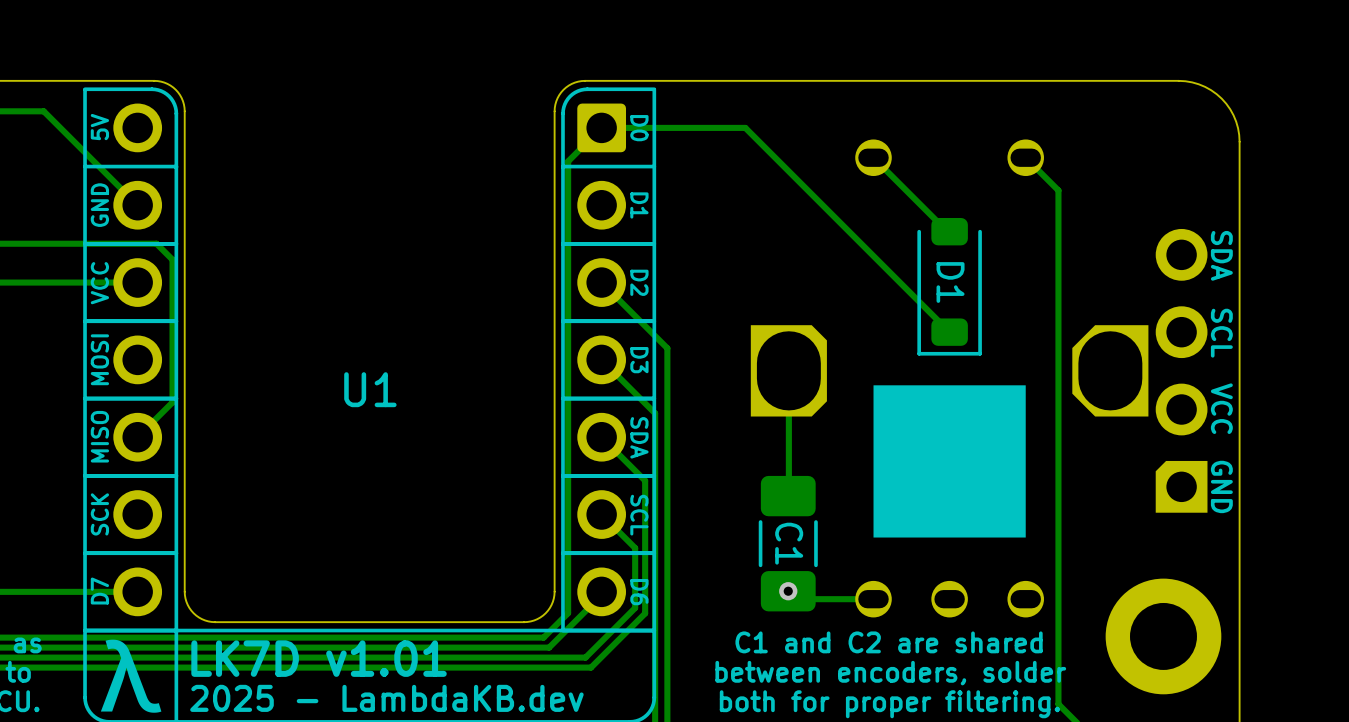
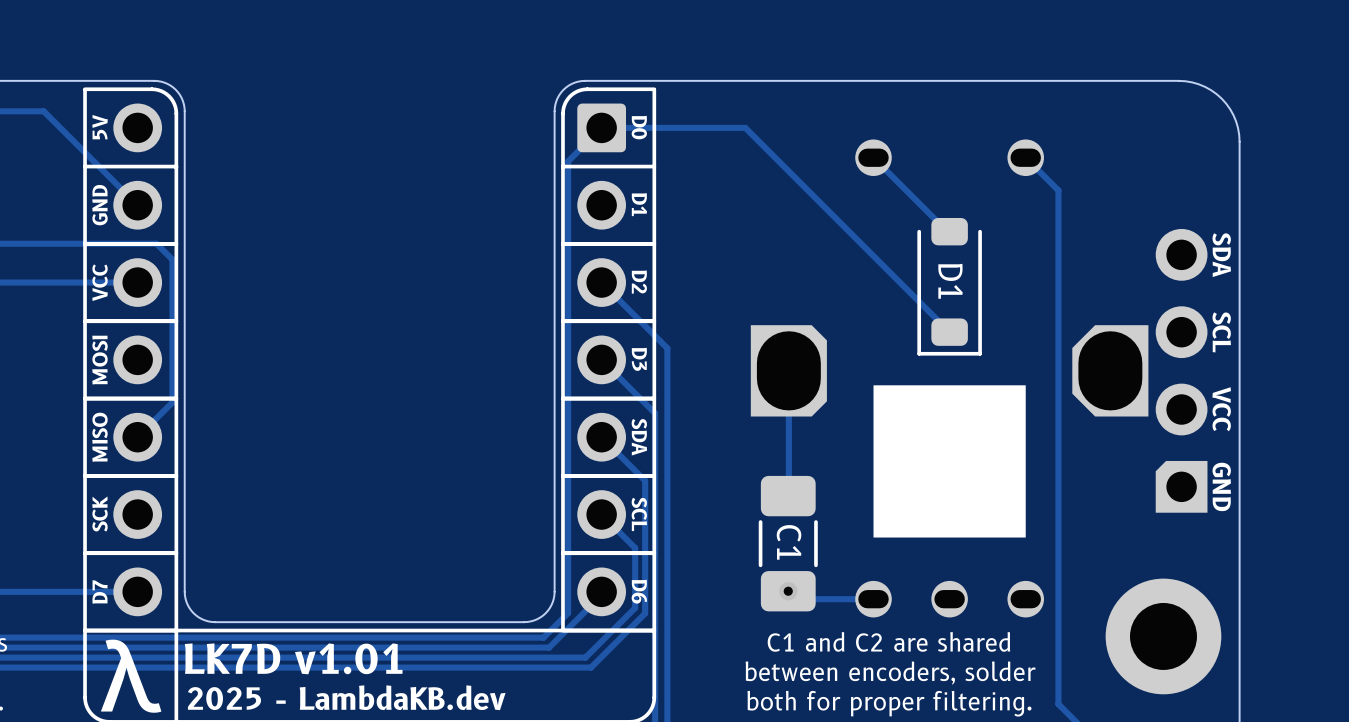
U1 name: U1 (370, 389) -> none

